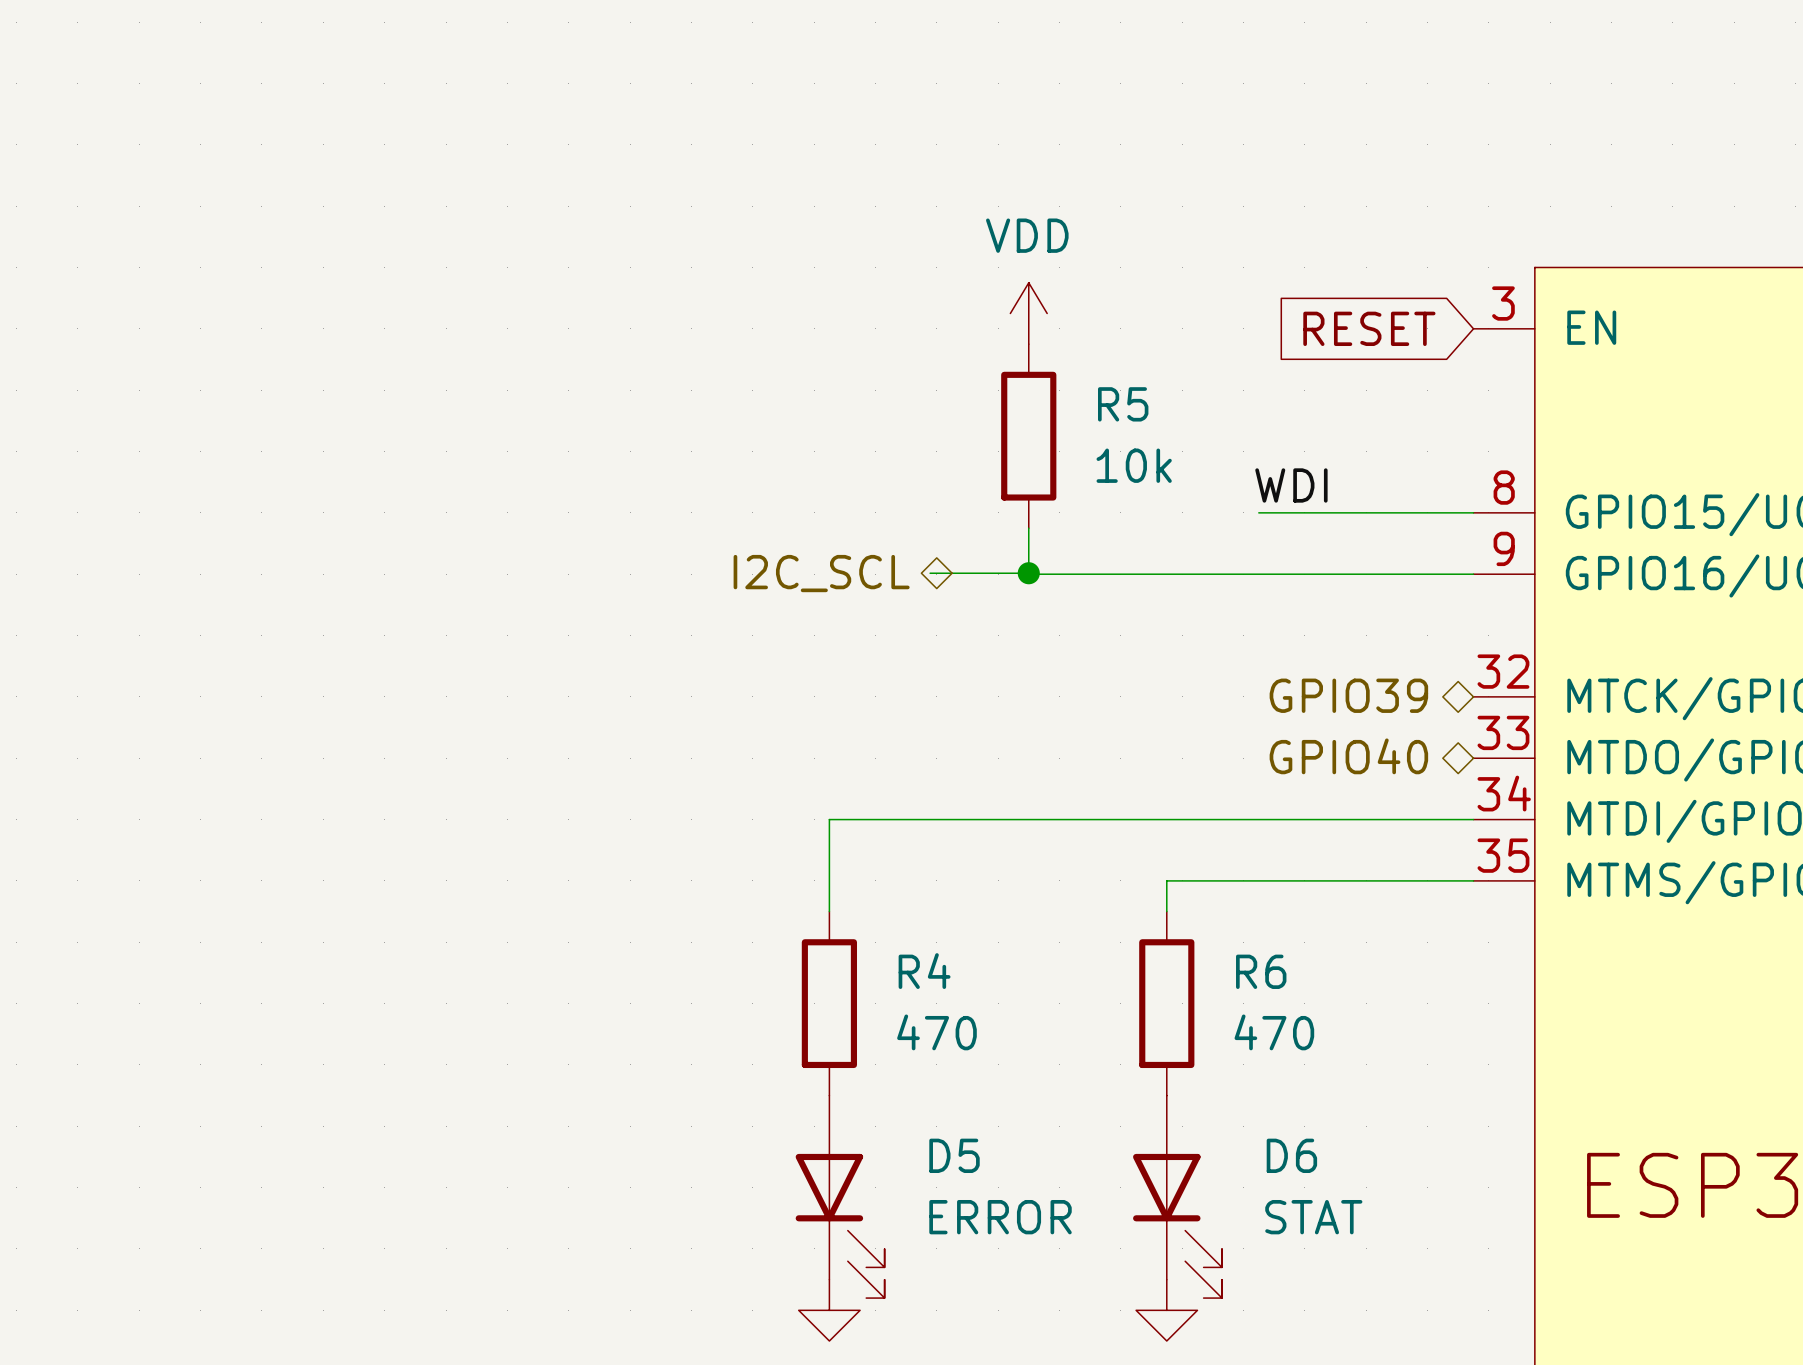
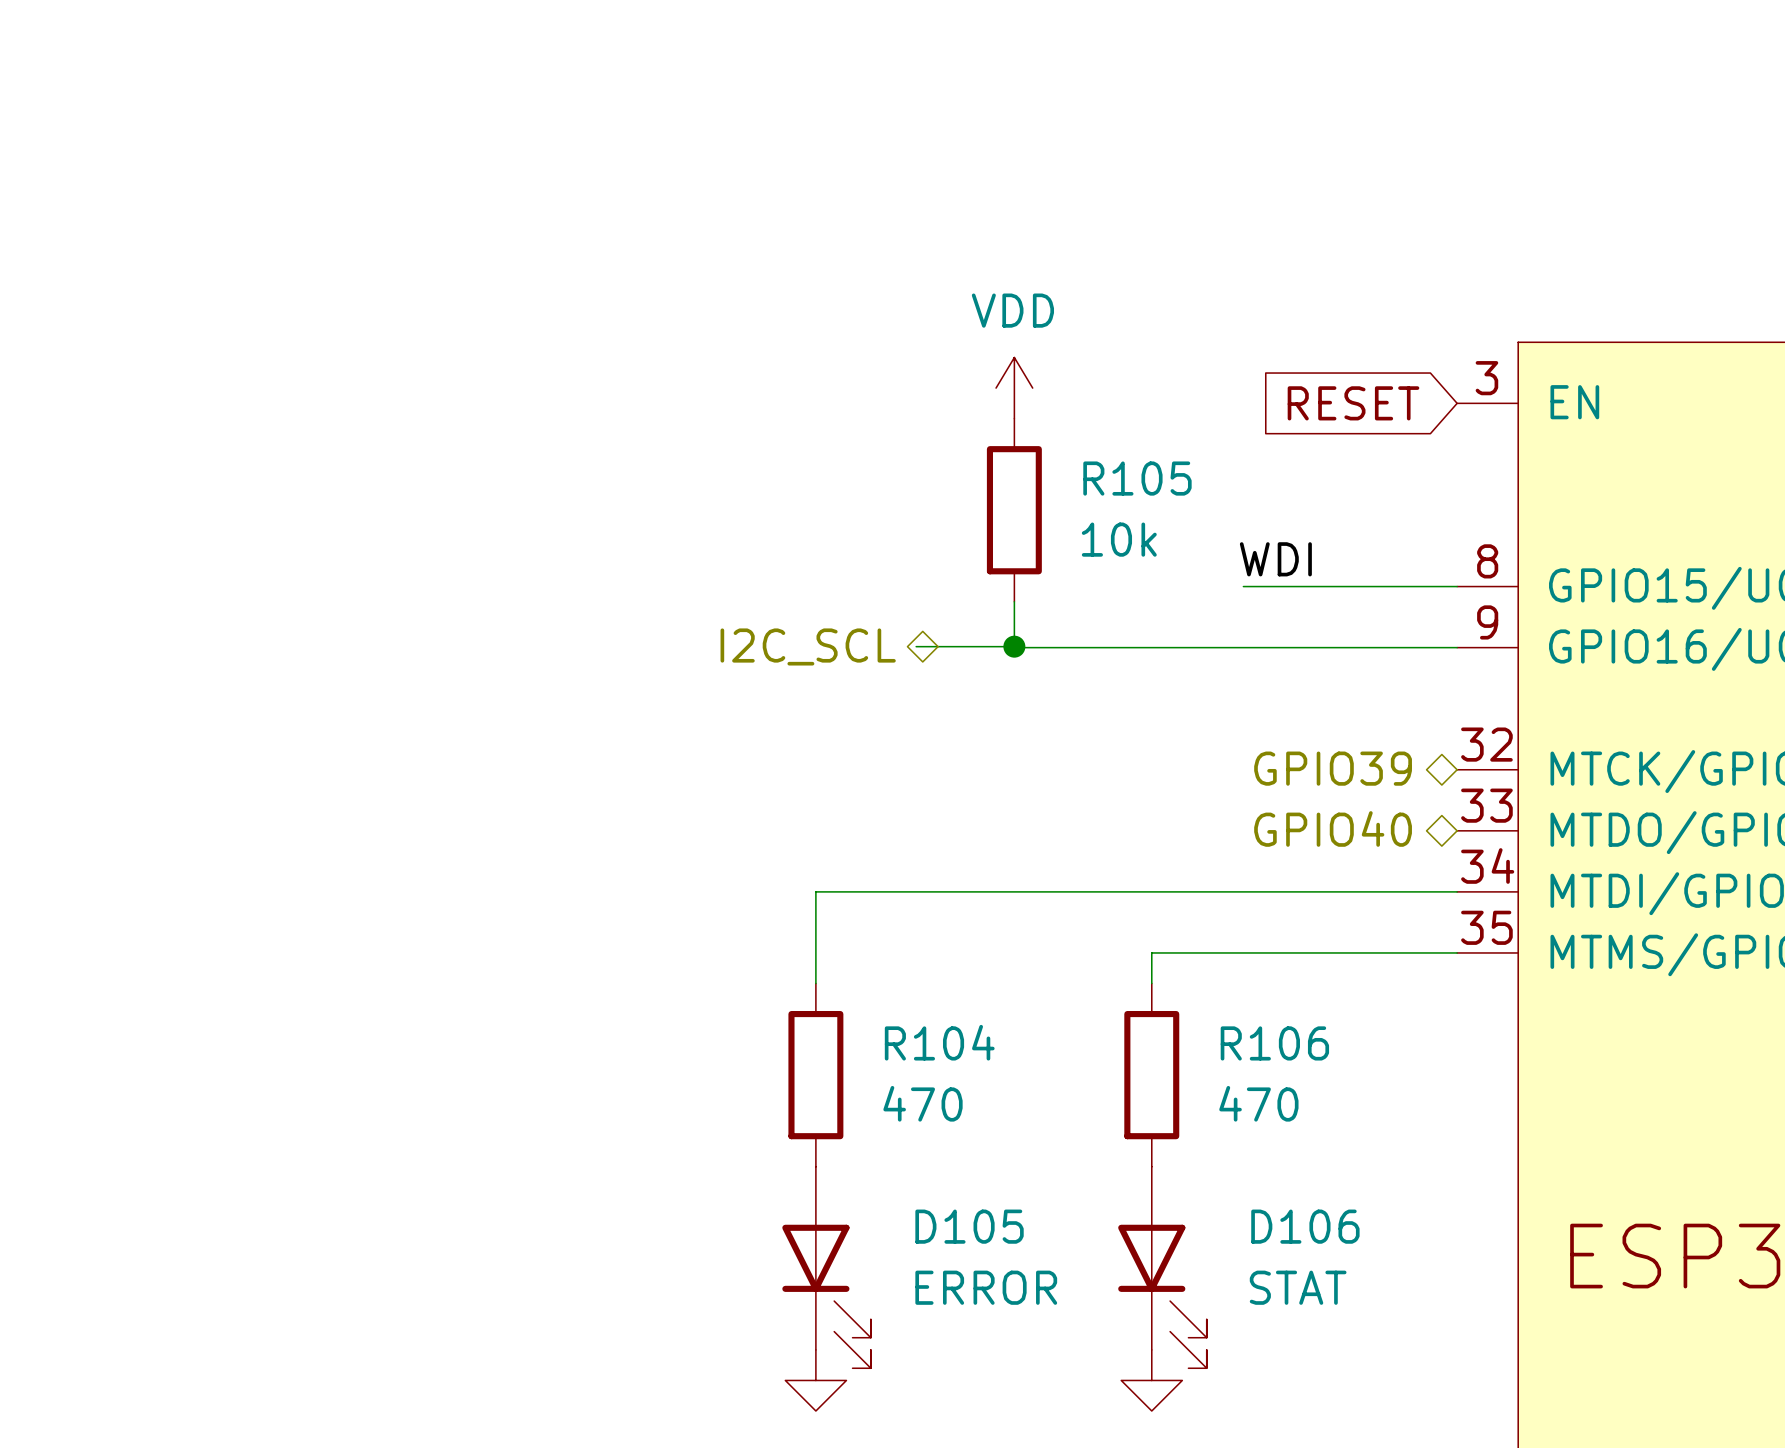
R5 name: R5 (1123, 404) -> R105 (1137, 478)
R4 name: R4 (924, 971) -> R104 (939, 1042)
R6 name: R6 (1261, 971) -> R106 (1274, 1043)
D5 name: D5 (954, 1155) -> D105 (969, 1226)
D6 name: D6 (1291, 1155) -> D106 (1305, 1226)

